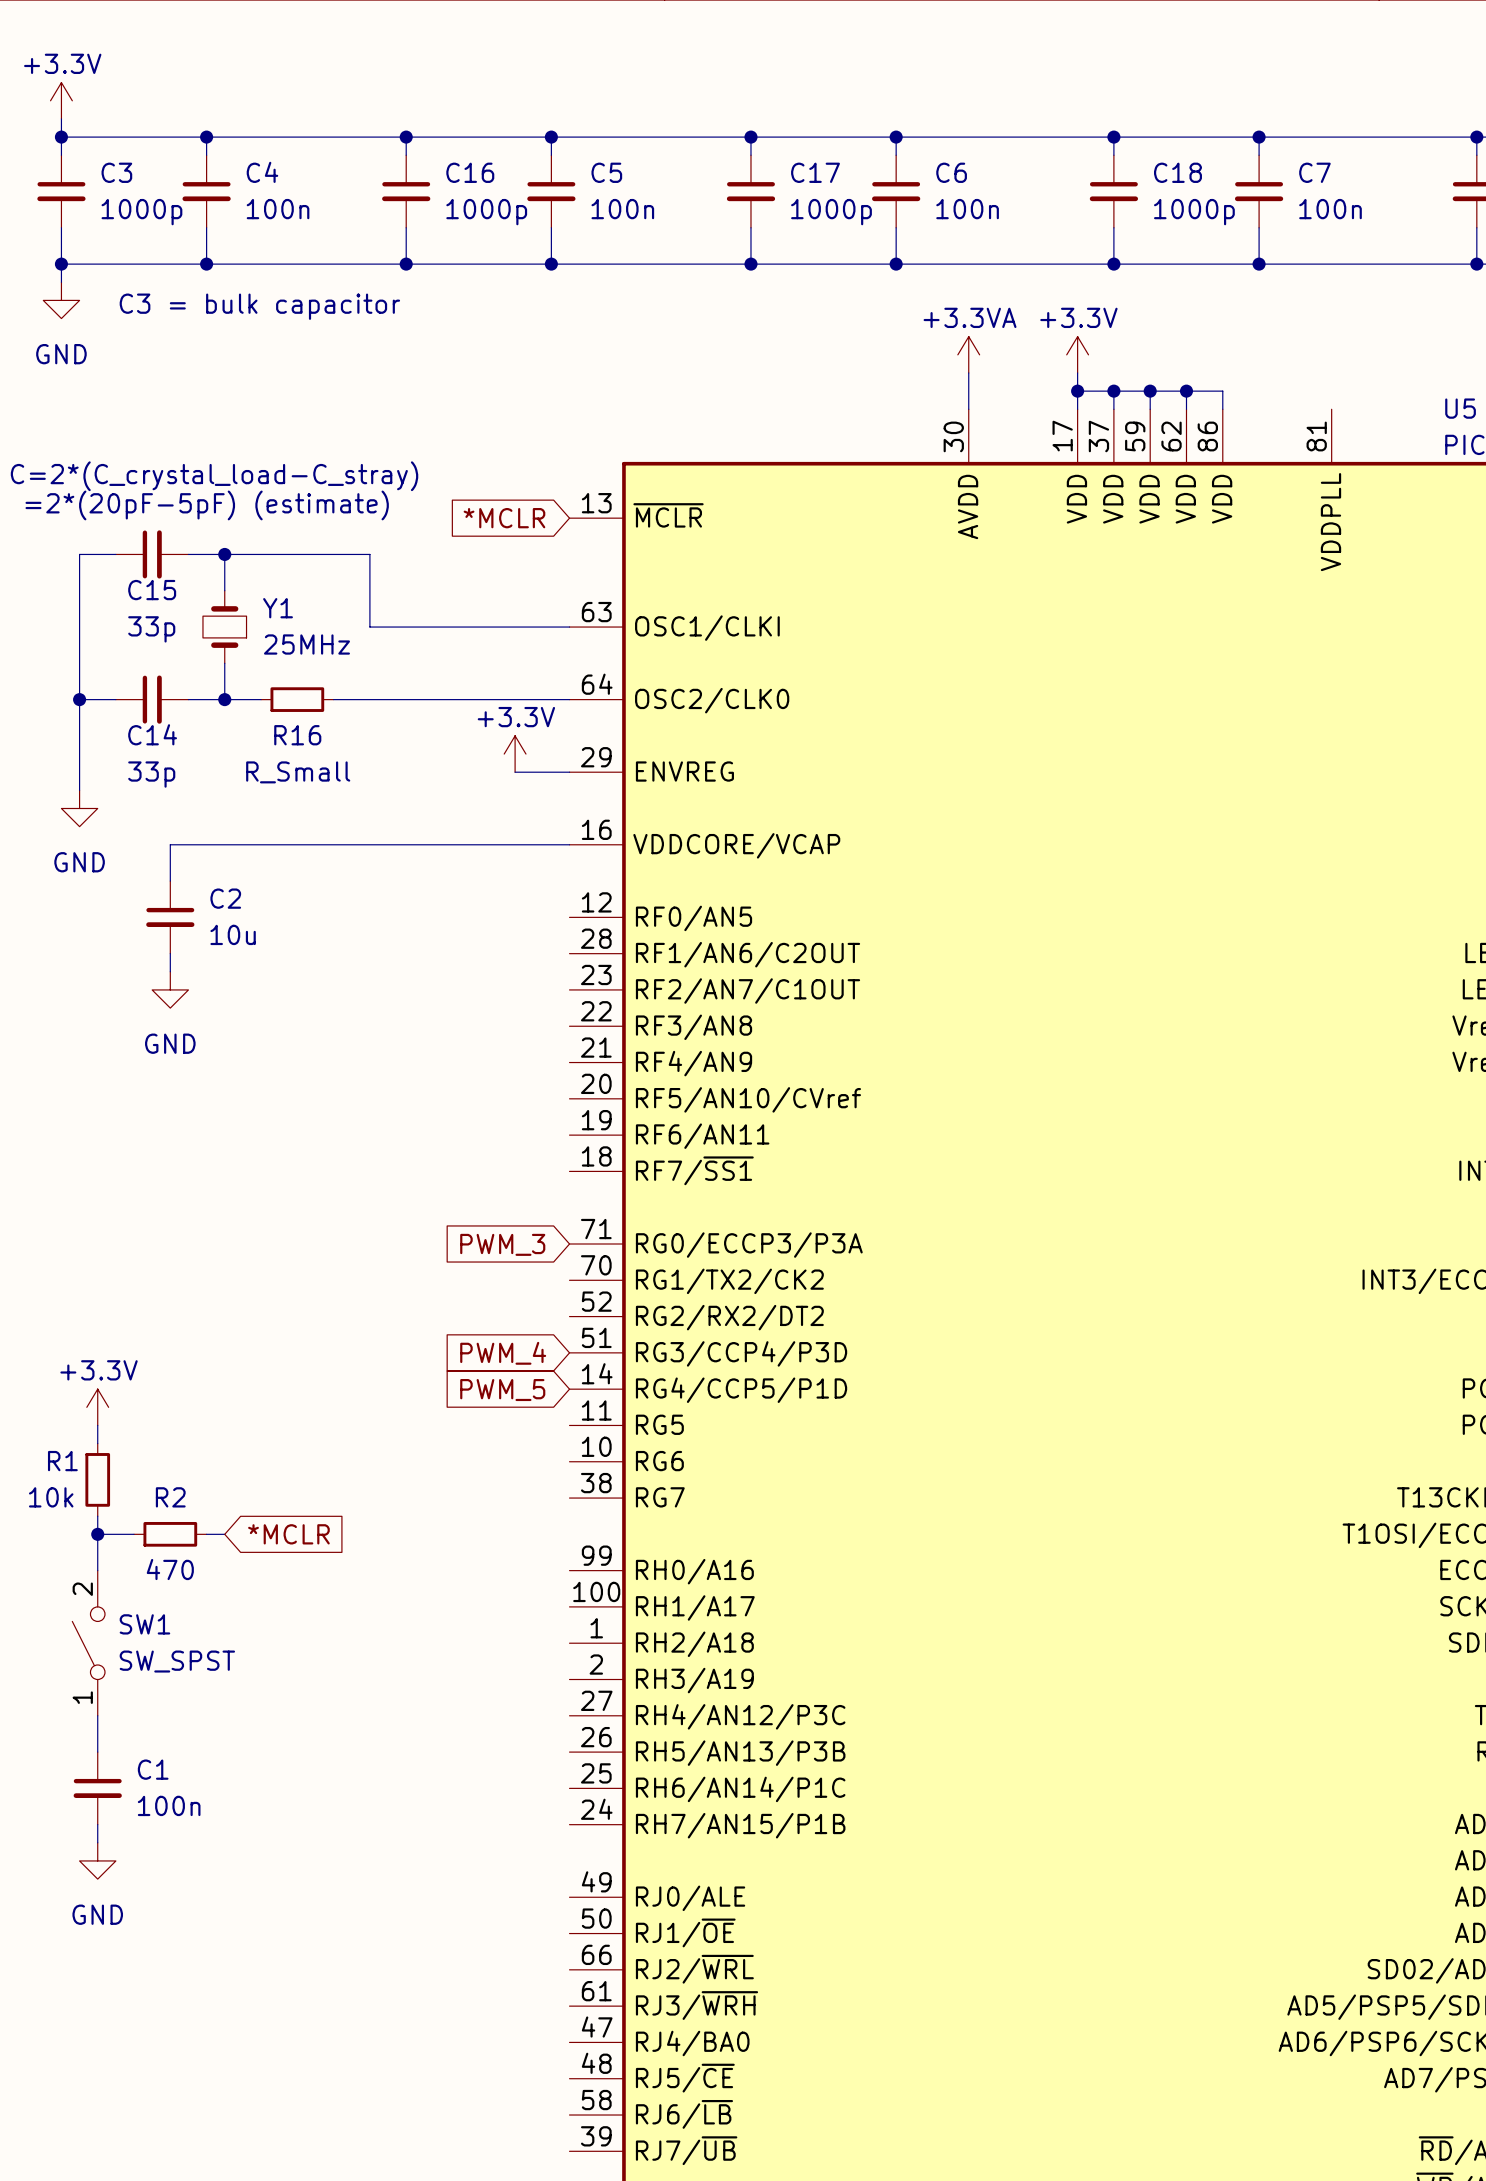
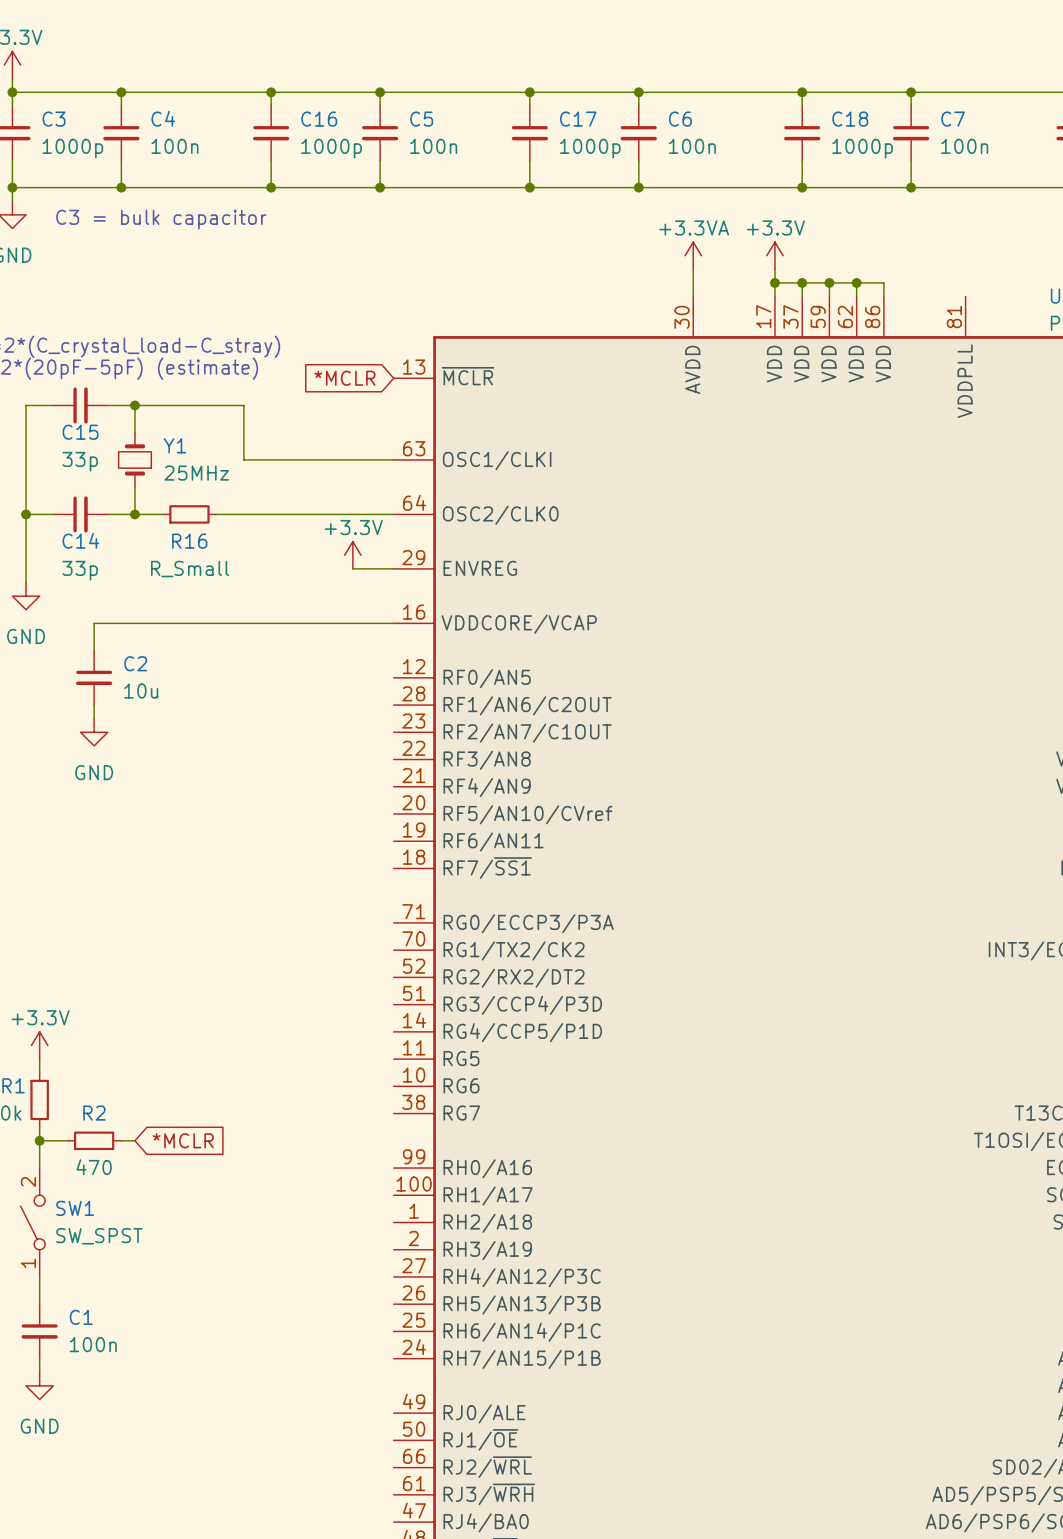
global label: PWM_3 (502, 1244) -> none
global label: PWM_4 (503, 1353) -> none
global label: PWM_5 (502, 1390) -> none

